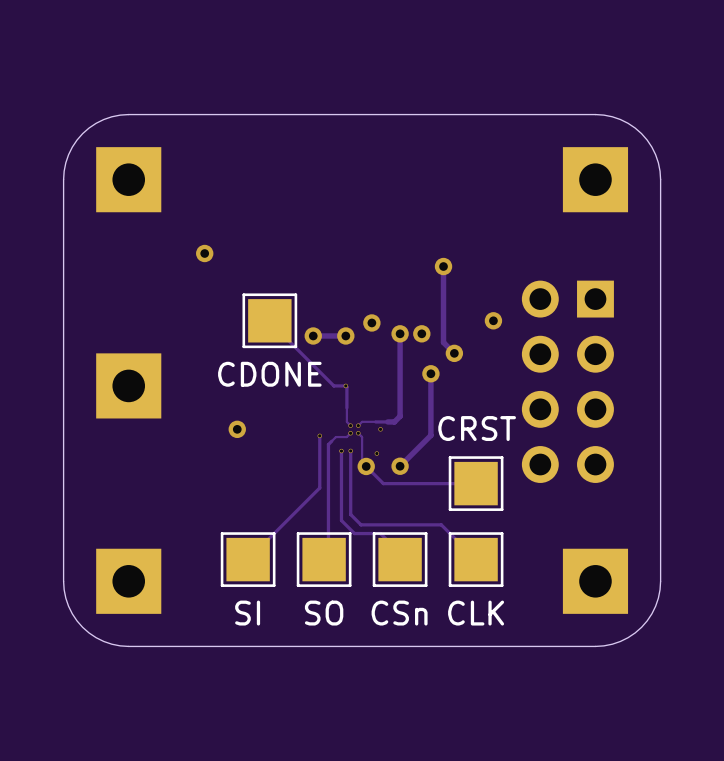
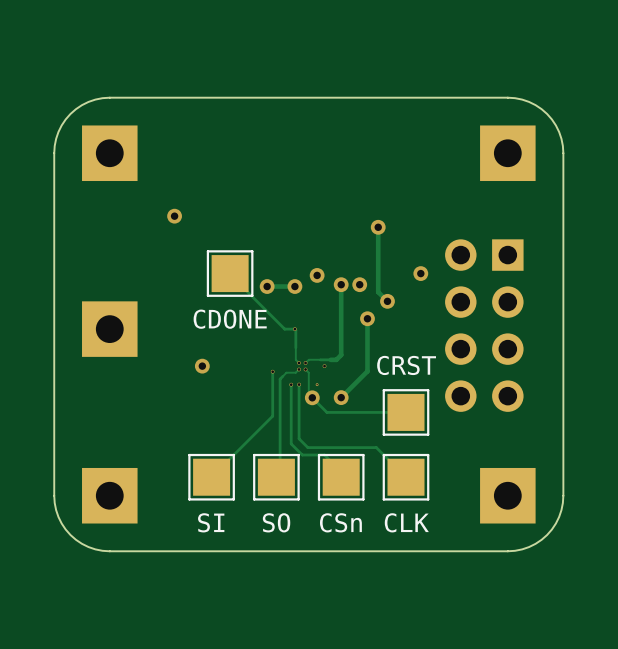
via: none -> (317, 384)
via: (376, 453) -> none

